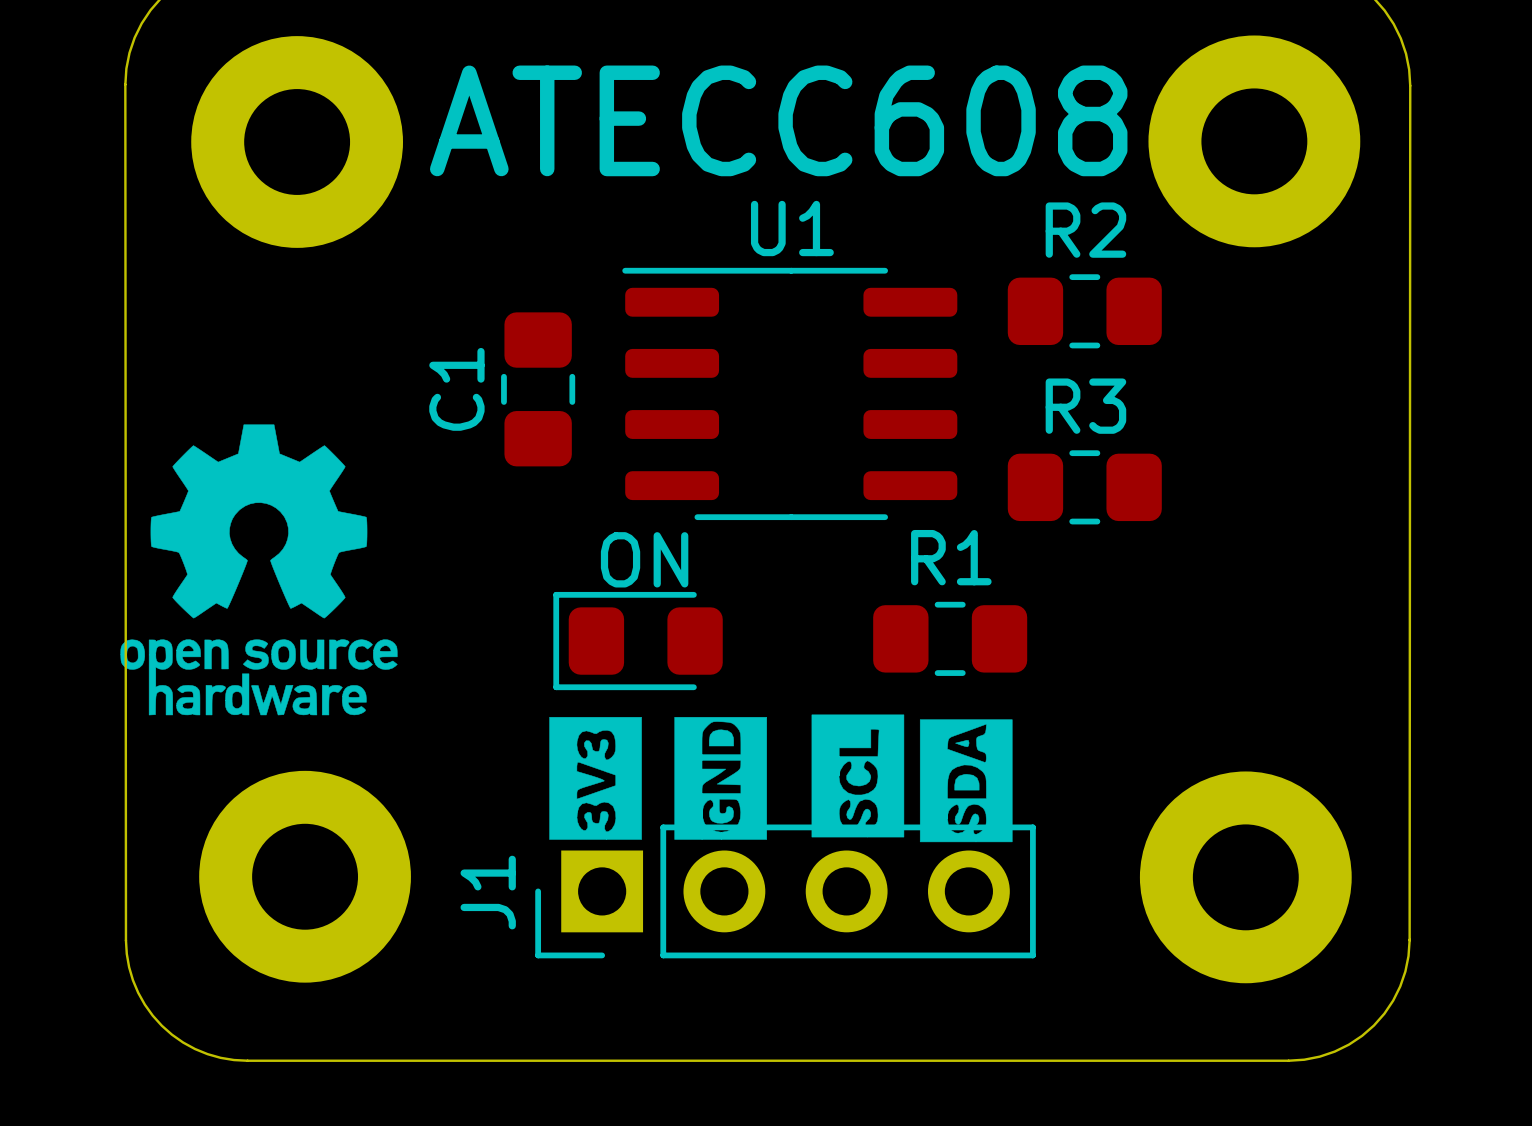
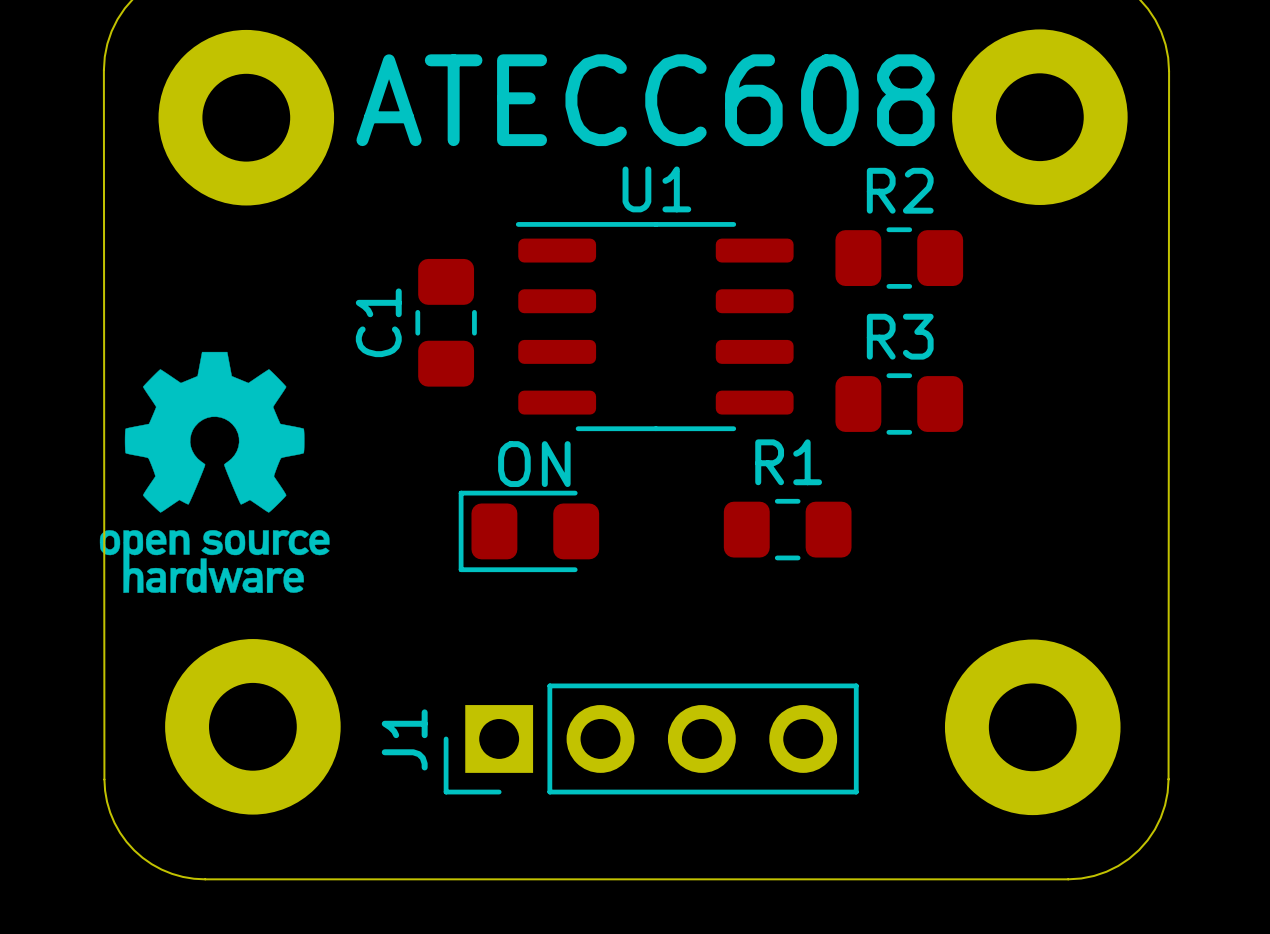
drawing: [549, 714, 1013, 843] -> none

